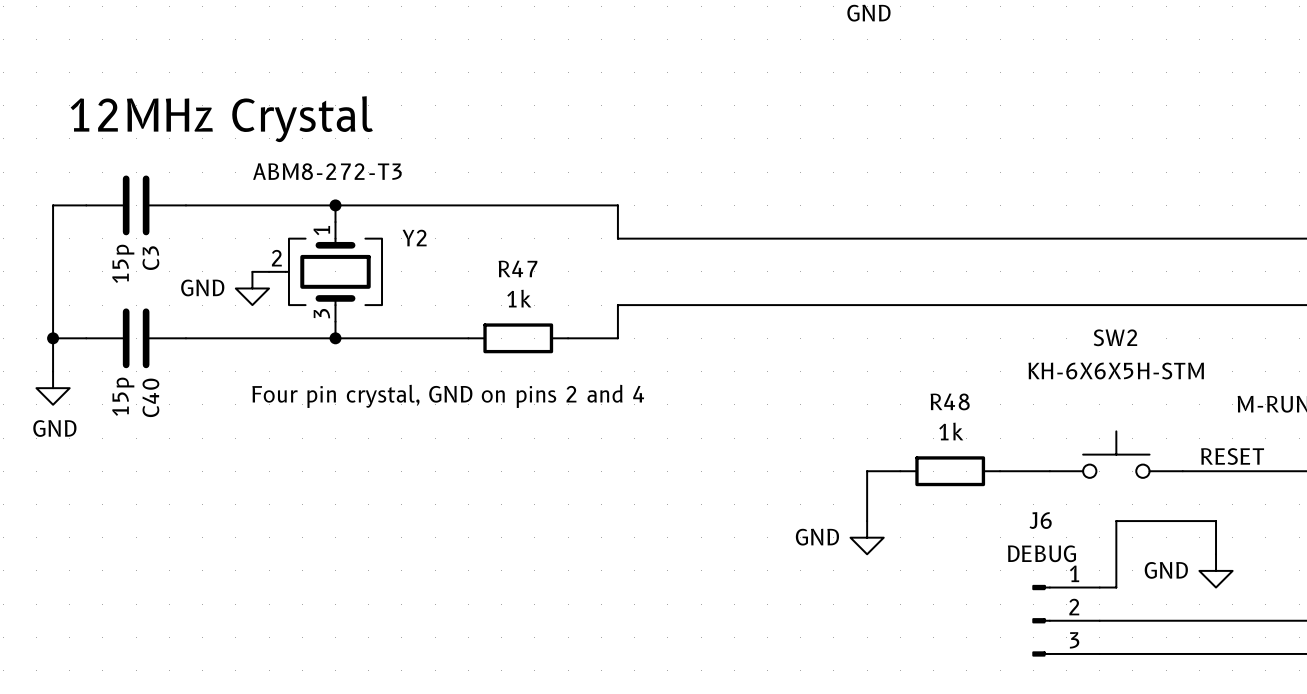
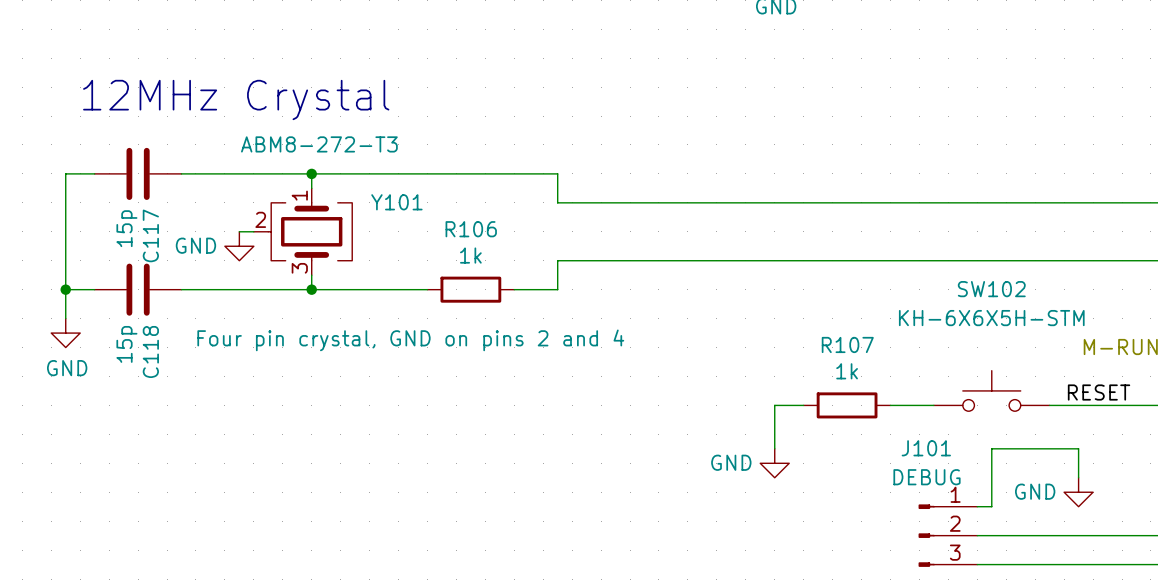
Y2 name: Y2 (414, 238) -> Y101 (396, 202)
C3 name: C3 (150, 258) -> C117 (150, 235)
R47 name: R47 (518, 268) -> R106 (471, 229)
SW2 name: SW2 (1115, 337) -> SW102 (991, 289)
C40 name: C40 (150, 397) -> C118 (150, 351)
R48 name: R48 (950, 401) -> R107 (847, 344)
J6 name: J6 (1040, 520) -> J101 (926, 448)

